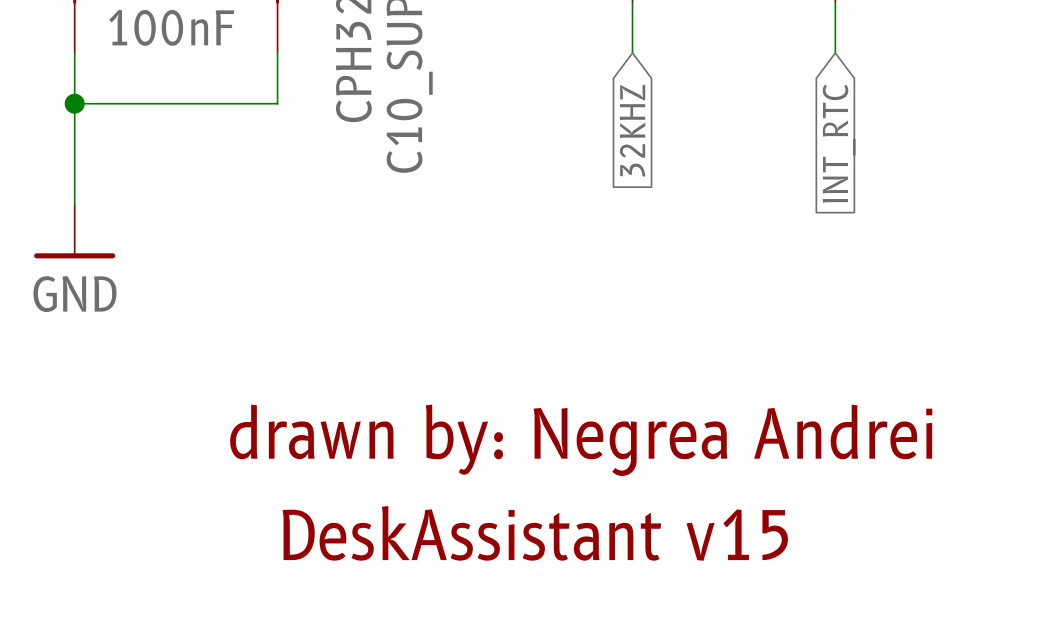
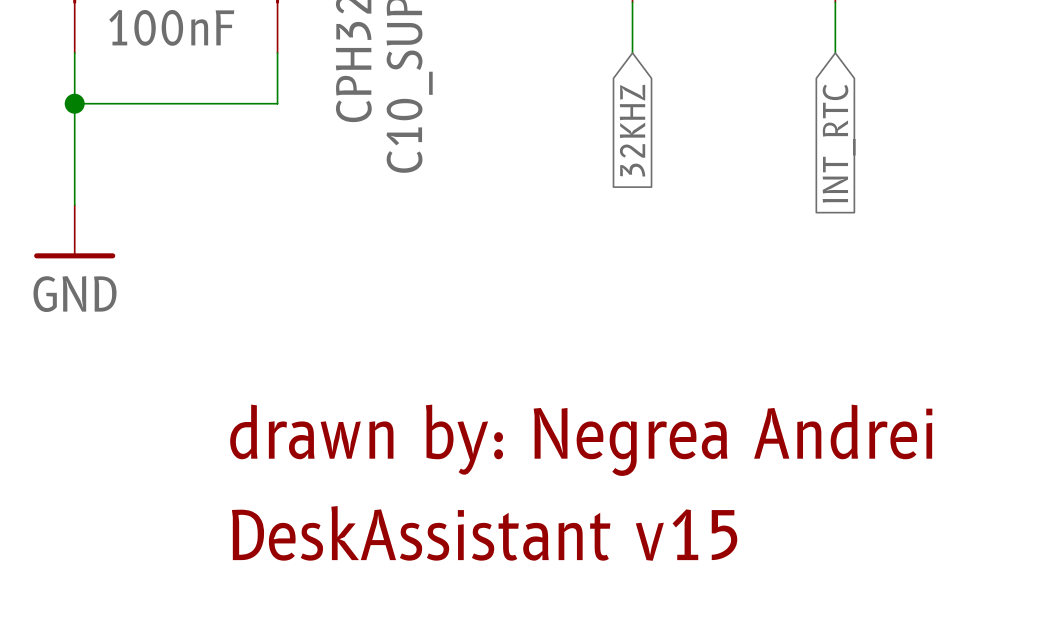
text position: DeskAssistant v15 (535, 533) -> DeskAssistant v15 (484, 533)

